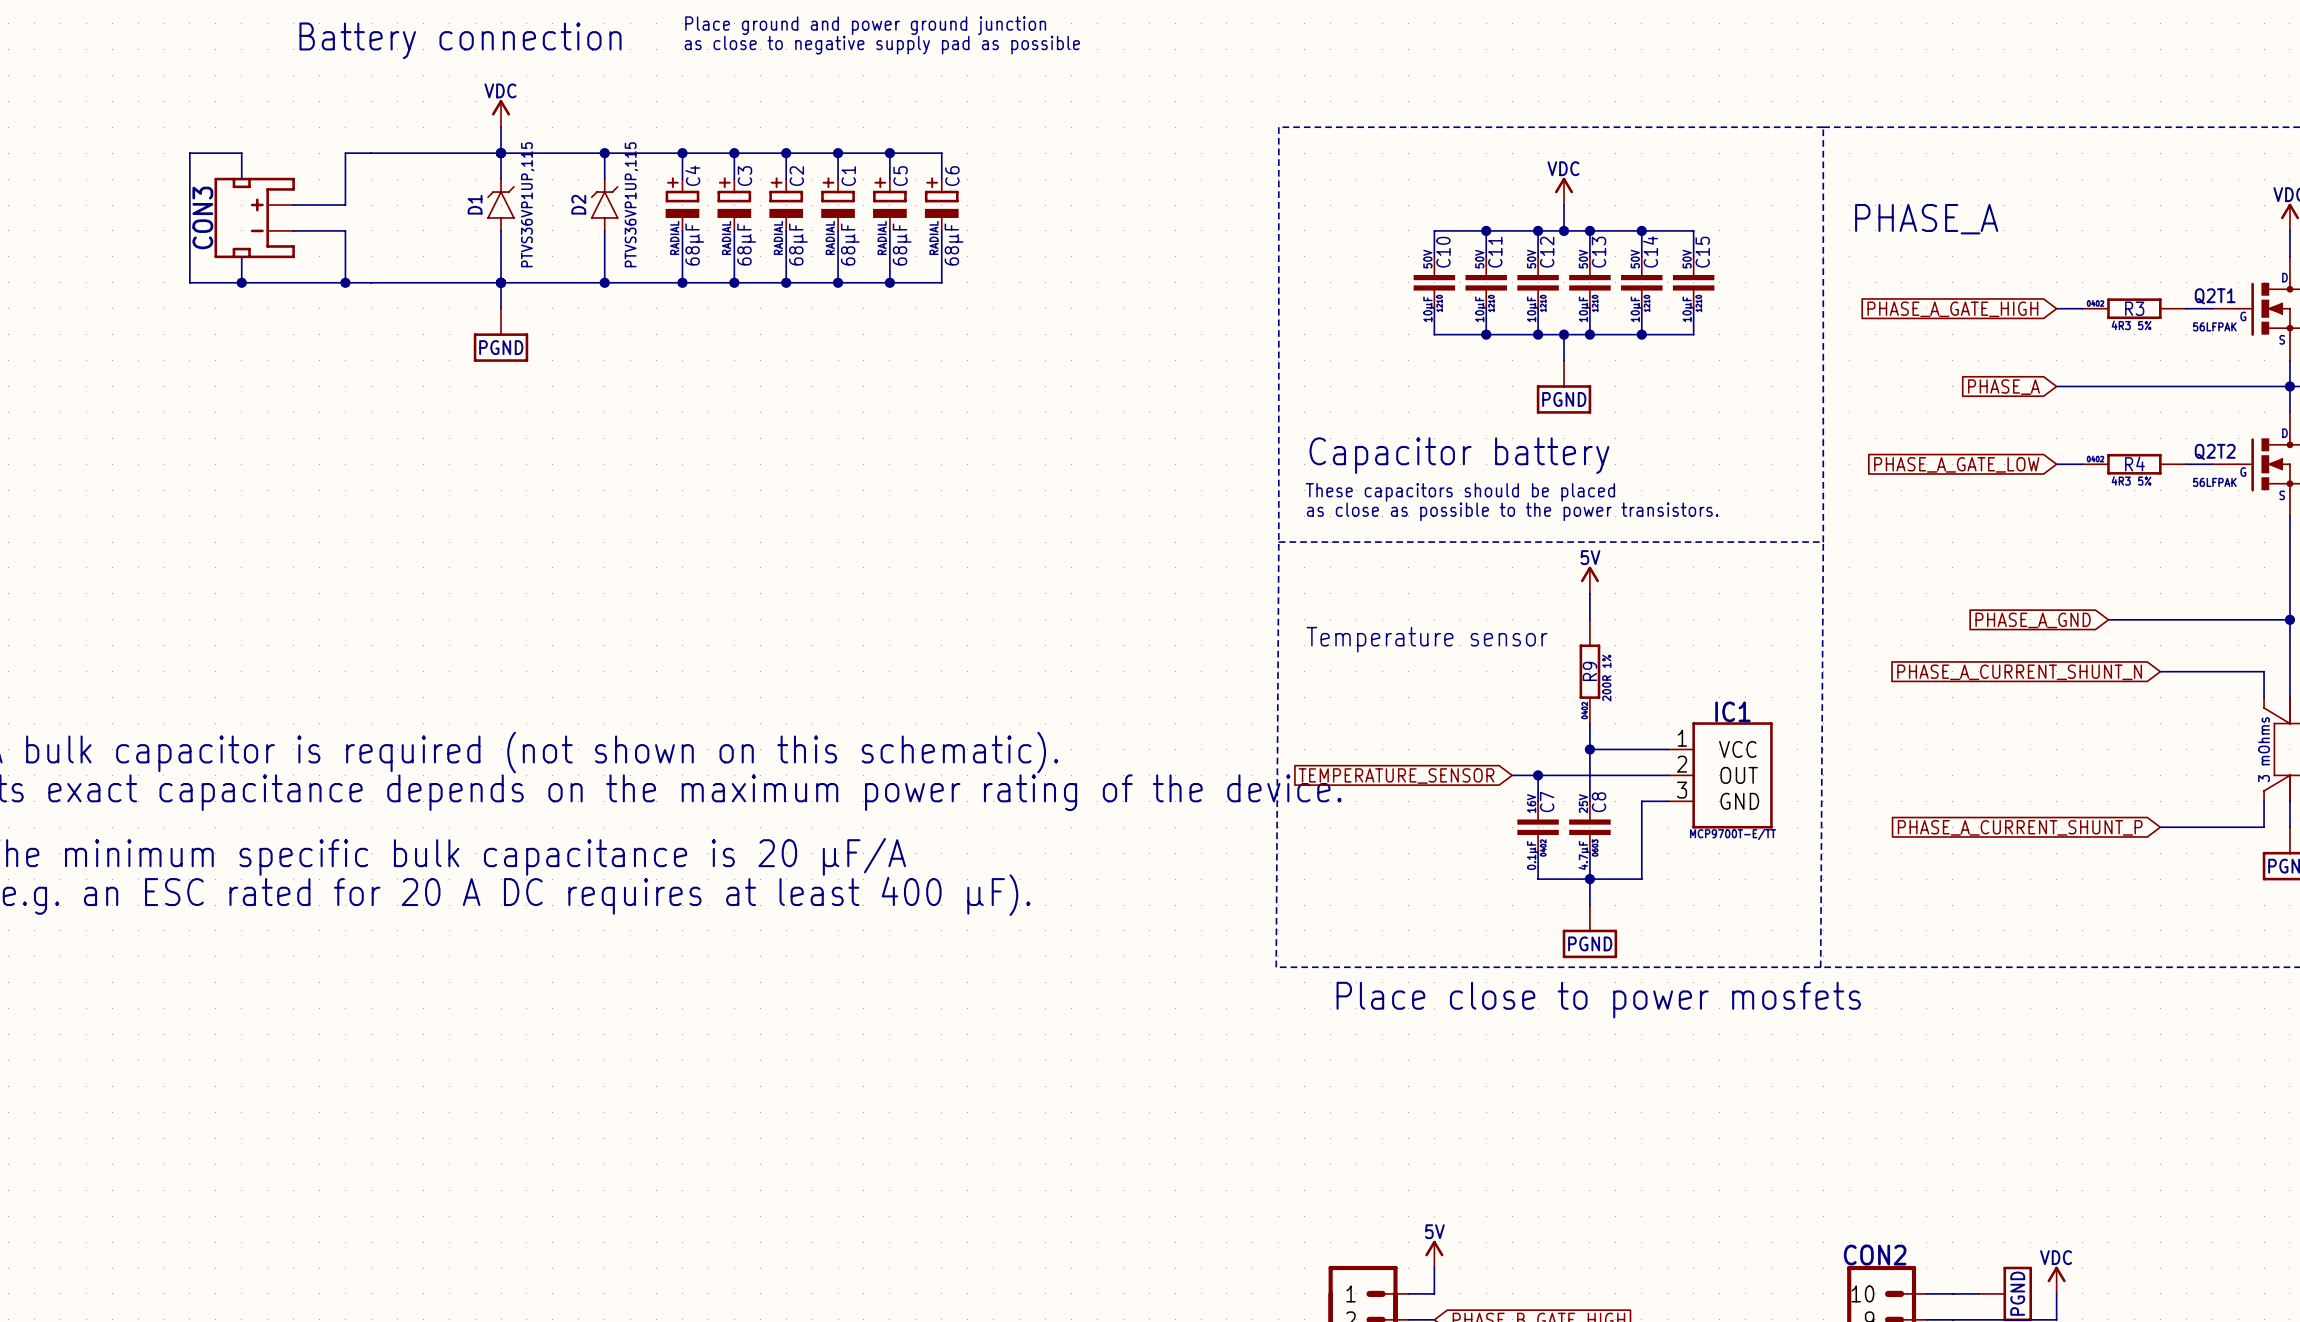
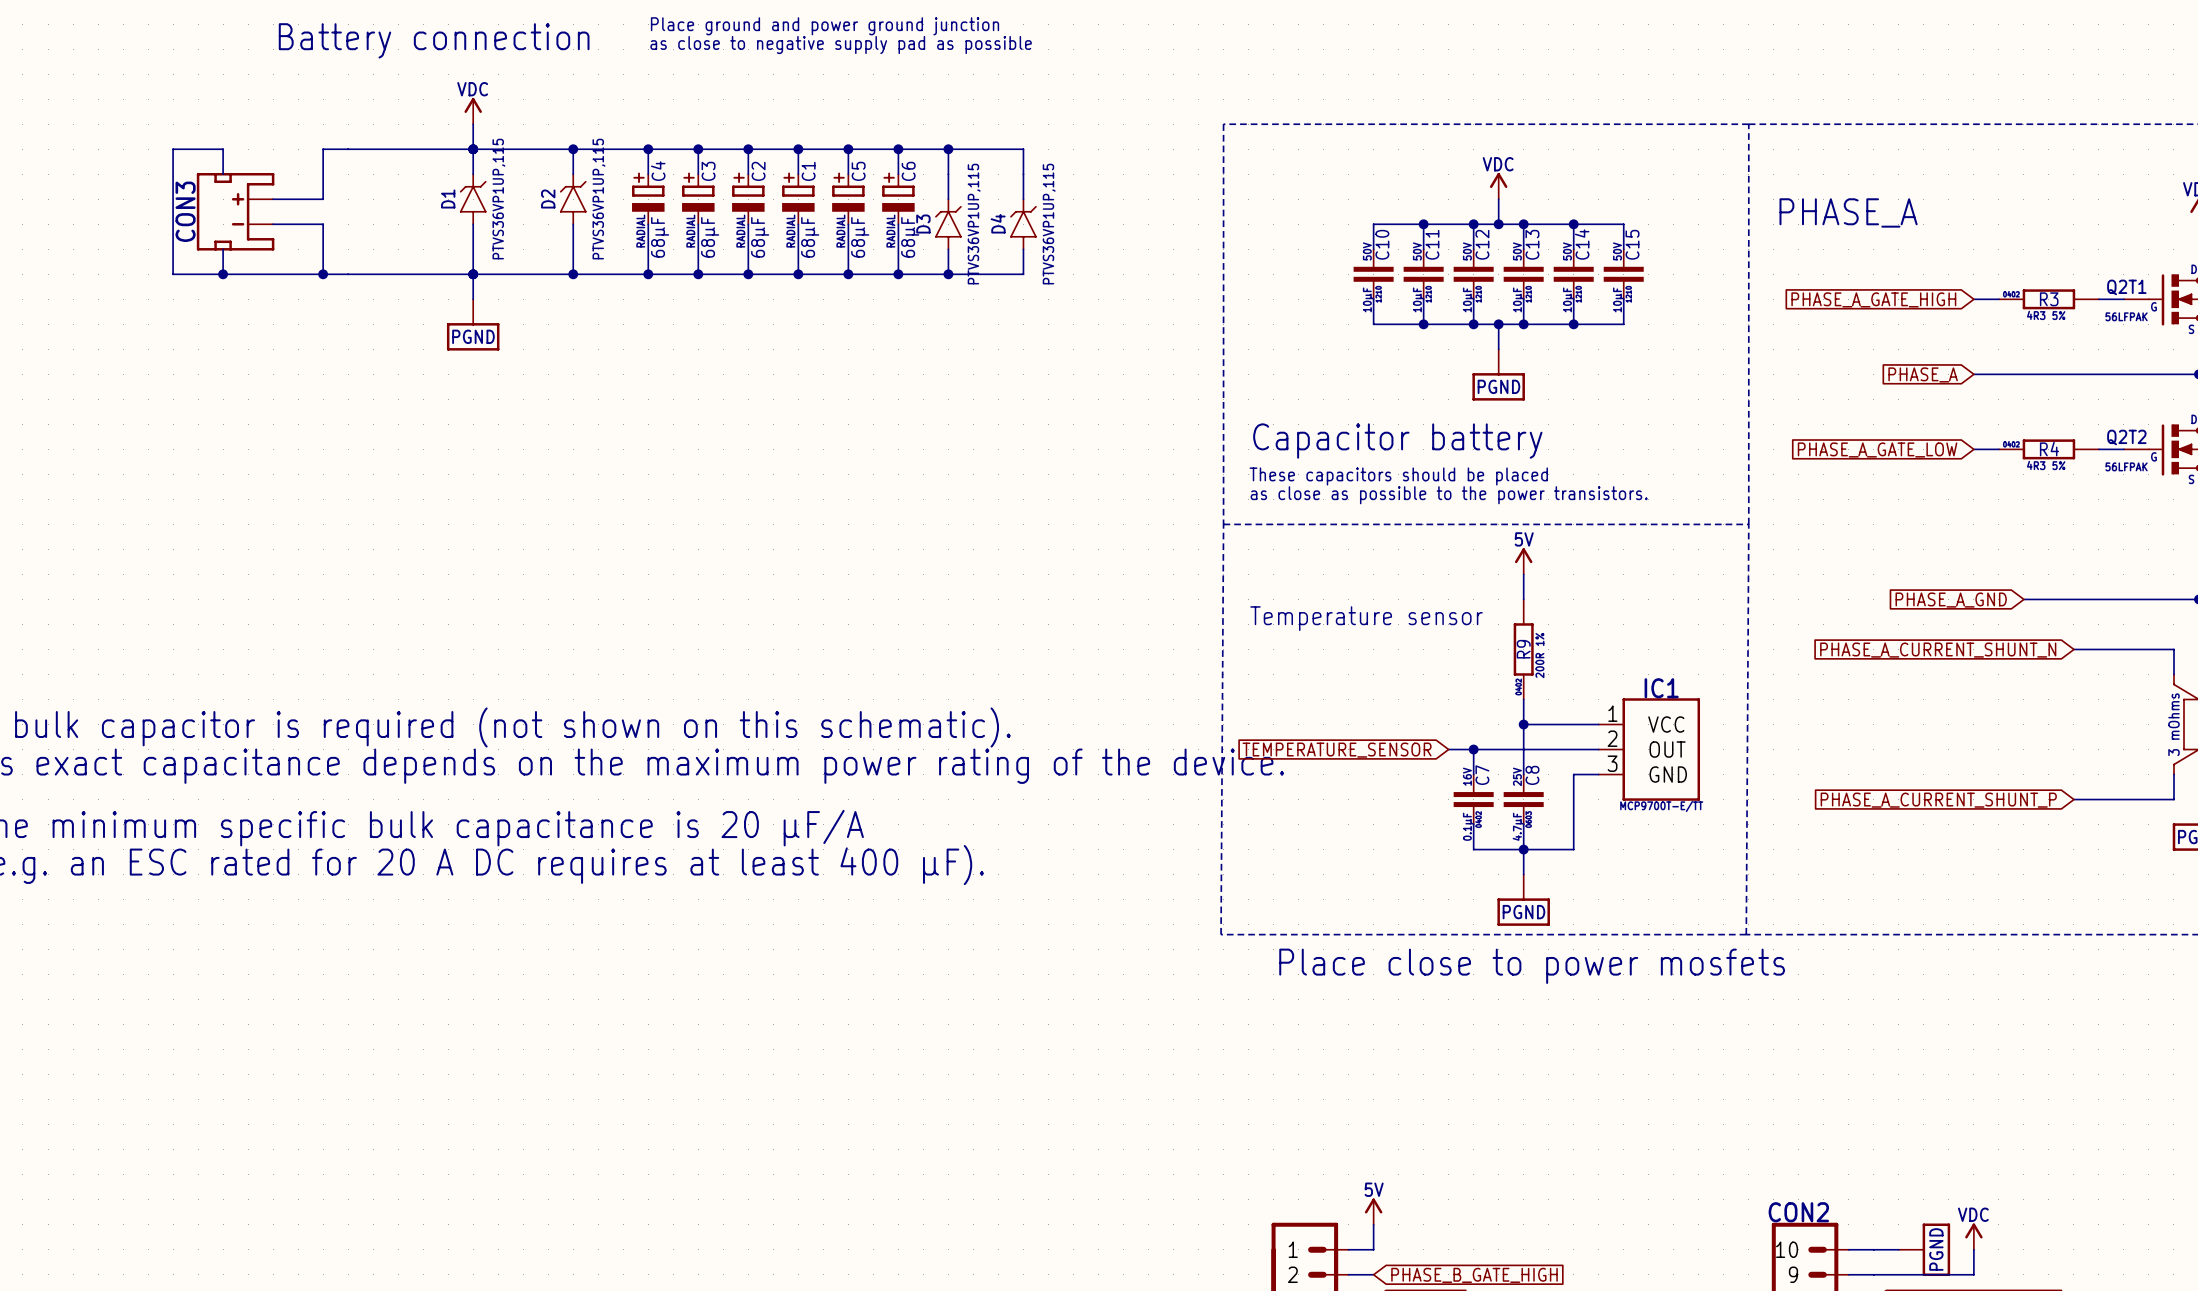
wire: none -> (898, 149) (1023, 149) (1023, 199)
junction: none -> (898, 149)
wire: none -> (948, 149) (948, 199)
junction: none -> (948, 149)
D3: none -> (948, 224)
D4: none -> (1023, 224)
wire: none -> (948, 249) (948, 274)
wire: none -> (1023, 249) (1023, 274) (898, 274)
junction: none -> (898, 274)
junction: none -> (948, 274)

